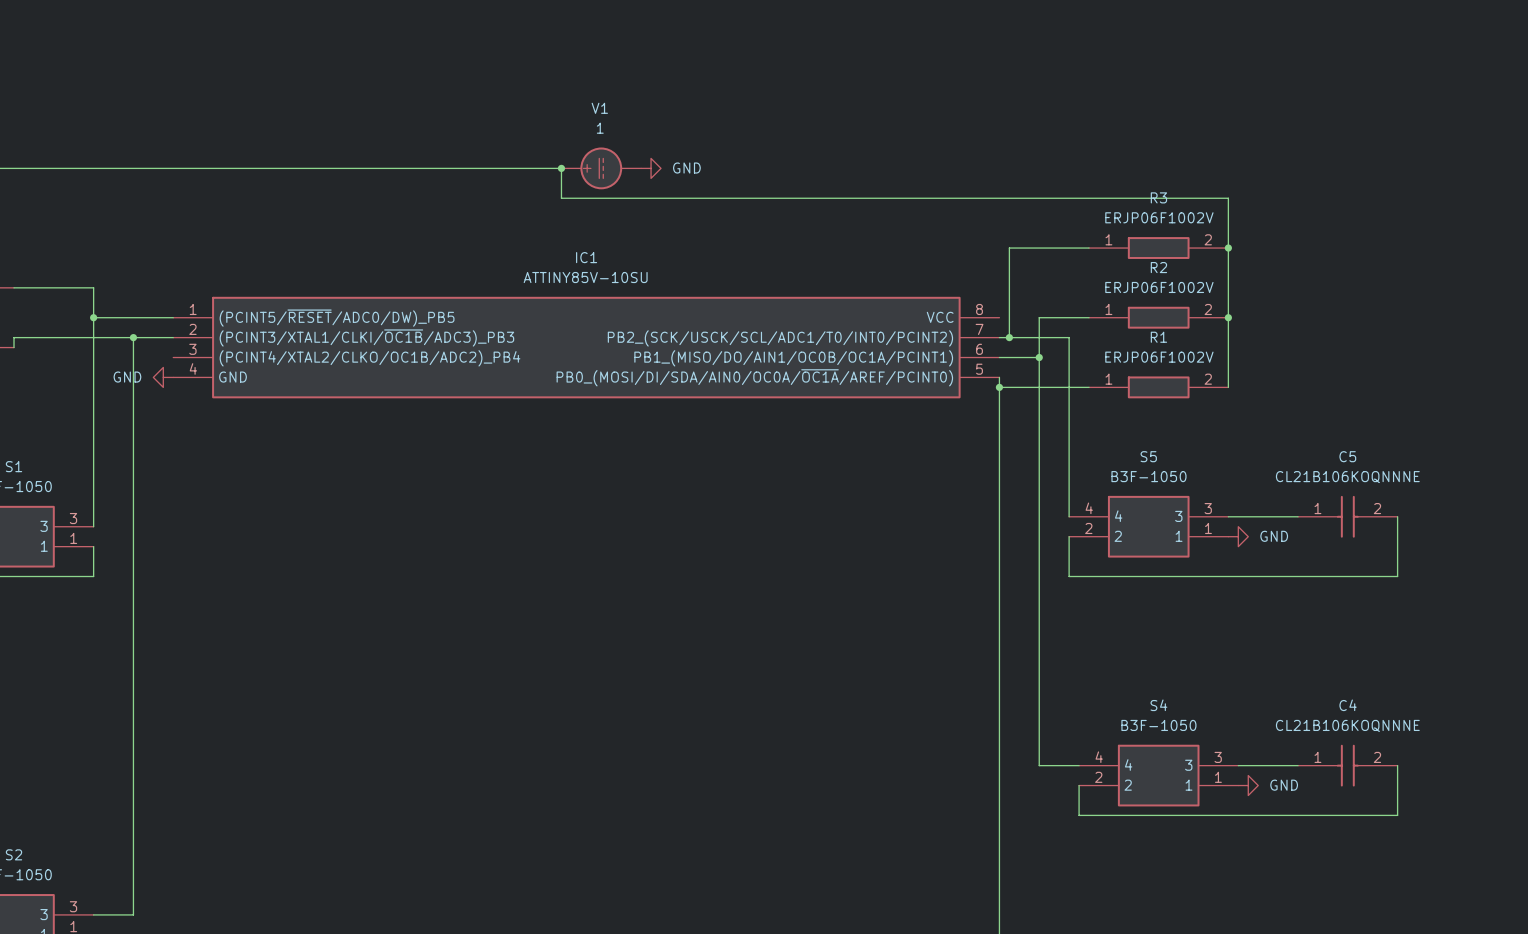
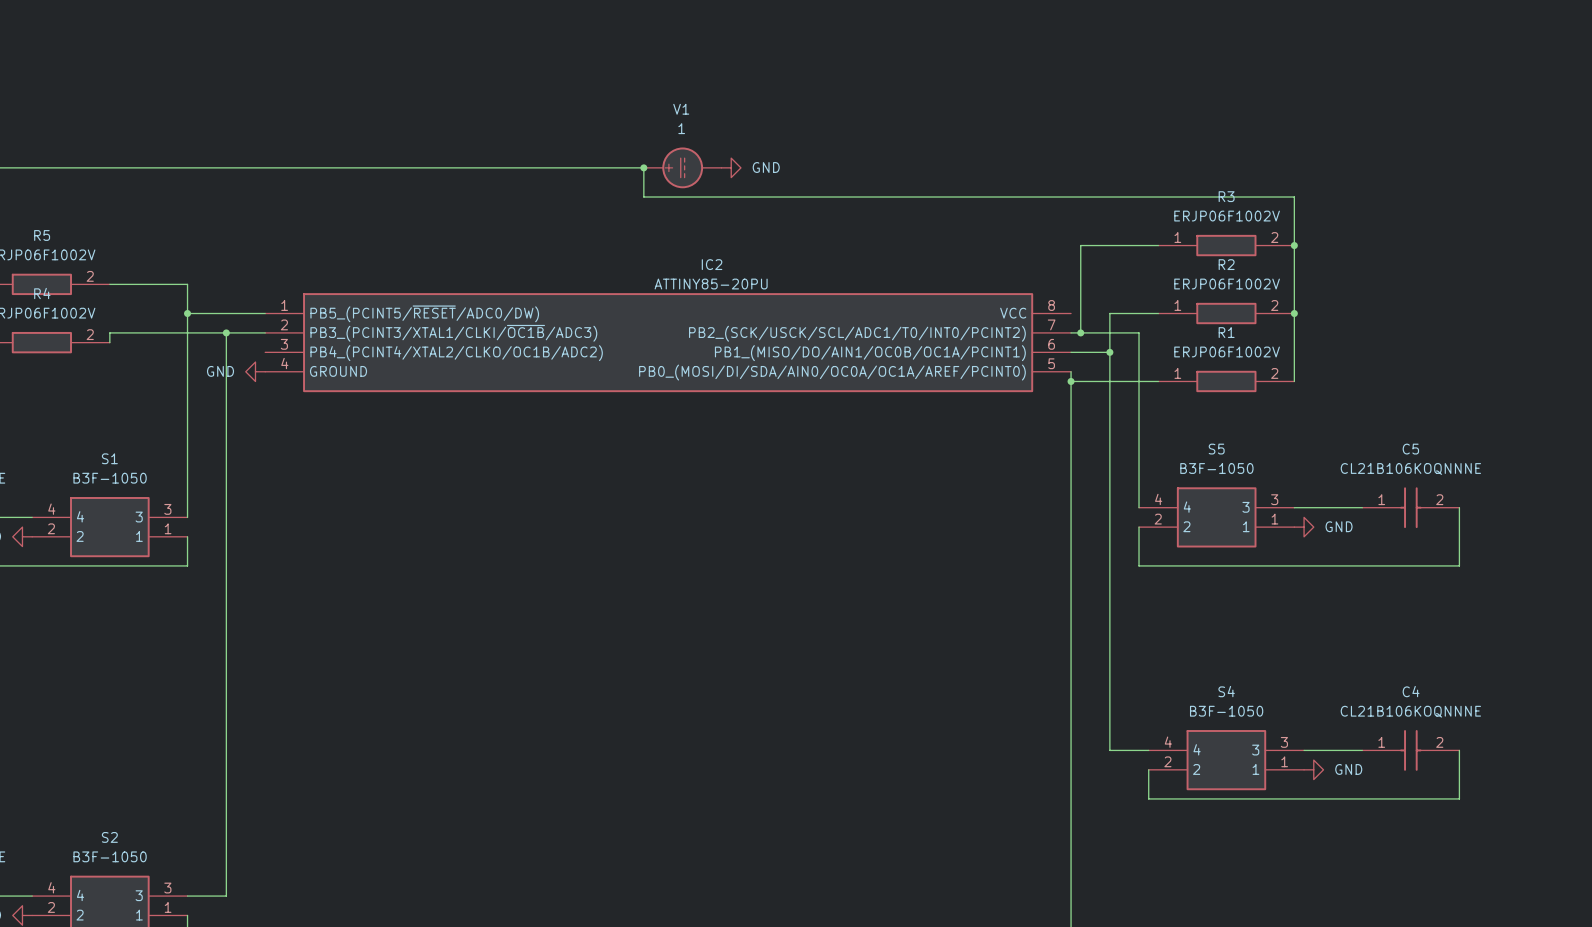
IC1 name: IC1 (586, 257) -> IC2 (712, 264)
IC1 value: ATTINY85V-10SU (585, 277) -> ATTINY85-20PU (711, 284)
IC1 pin name: (PCINT5/~{RESET}/ADC0/DW)_PB5 (337, 318) -> PB5_(PCINT5/~{RESET}/ADC0/DW) (424, 313)
IC1 pin name: (PCINT3/XTAL1/CLKI/~{OC1B}/ADC3)_PB3 (366, 337) -> PB3_(PCINT3/XTAL1/CLKI/~{OC1B}/ADC3) (453, 333)
IC1 pin name: (PCINT4/XTAL2/CLKO/OC1B/ADC2)_PB4 (369, 358) -> PB4_(PCINT4/XTAL2/CLKO/OC1B/ADC2) (456, 353)
IC1 pin name: GND (233, 377) -> GROUND (338, 371)
IC1 pin name: PB0_(MOSI/DI/SDA/AIN0/OC0A/~{OC1A}/AREF/PCINT0) (754, 377) -> PB0_(MOSI/DI/SDA/AIN0/OC0A/OC1A/AREF/PCINT0) (832, 372)

